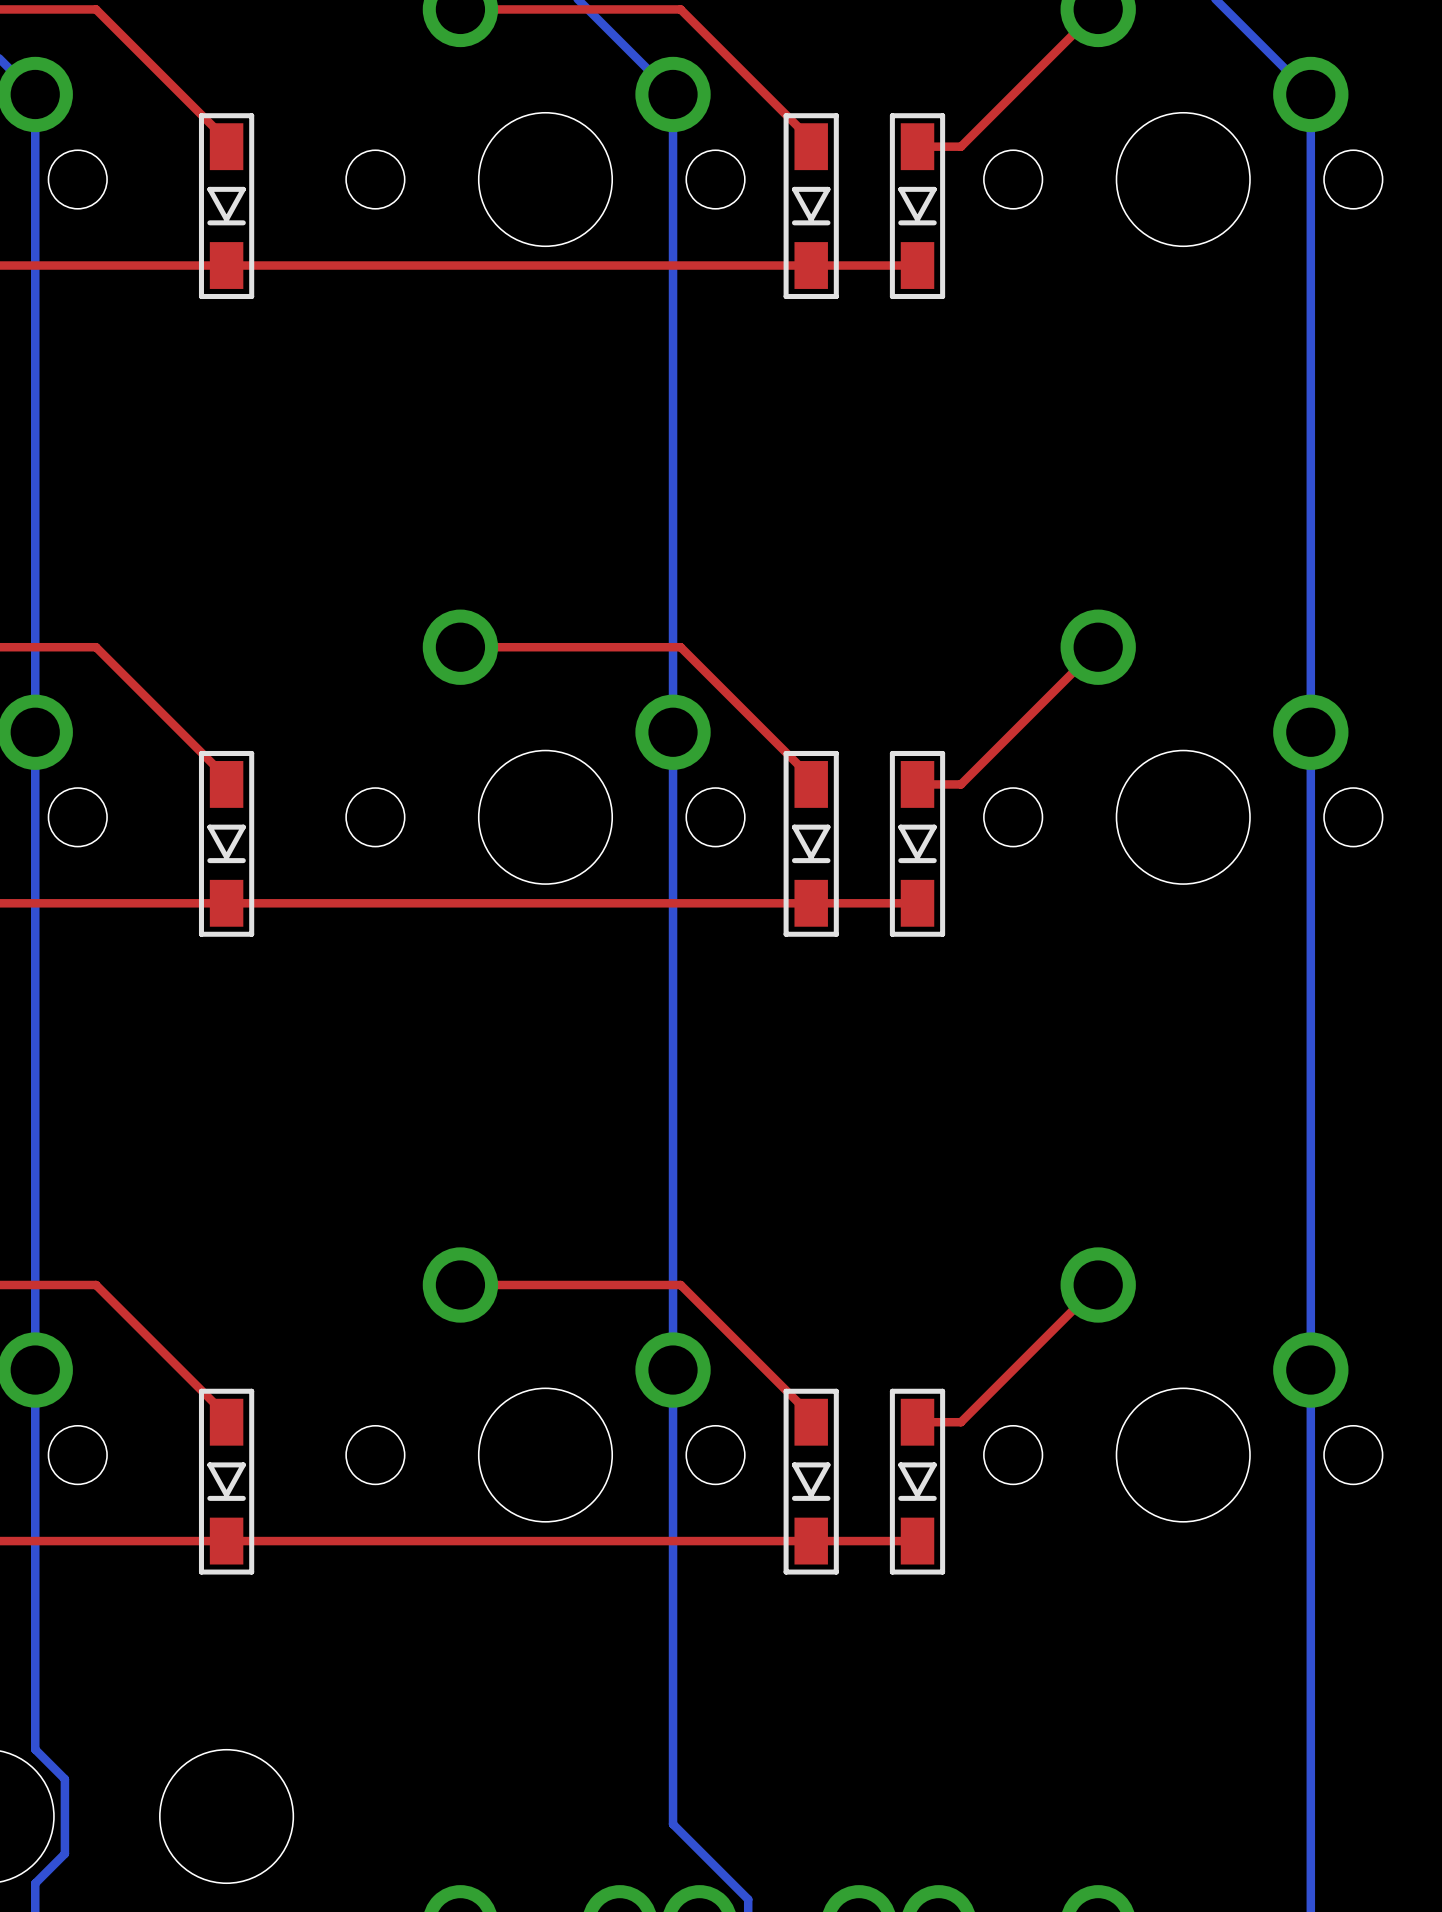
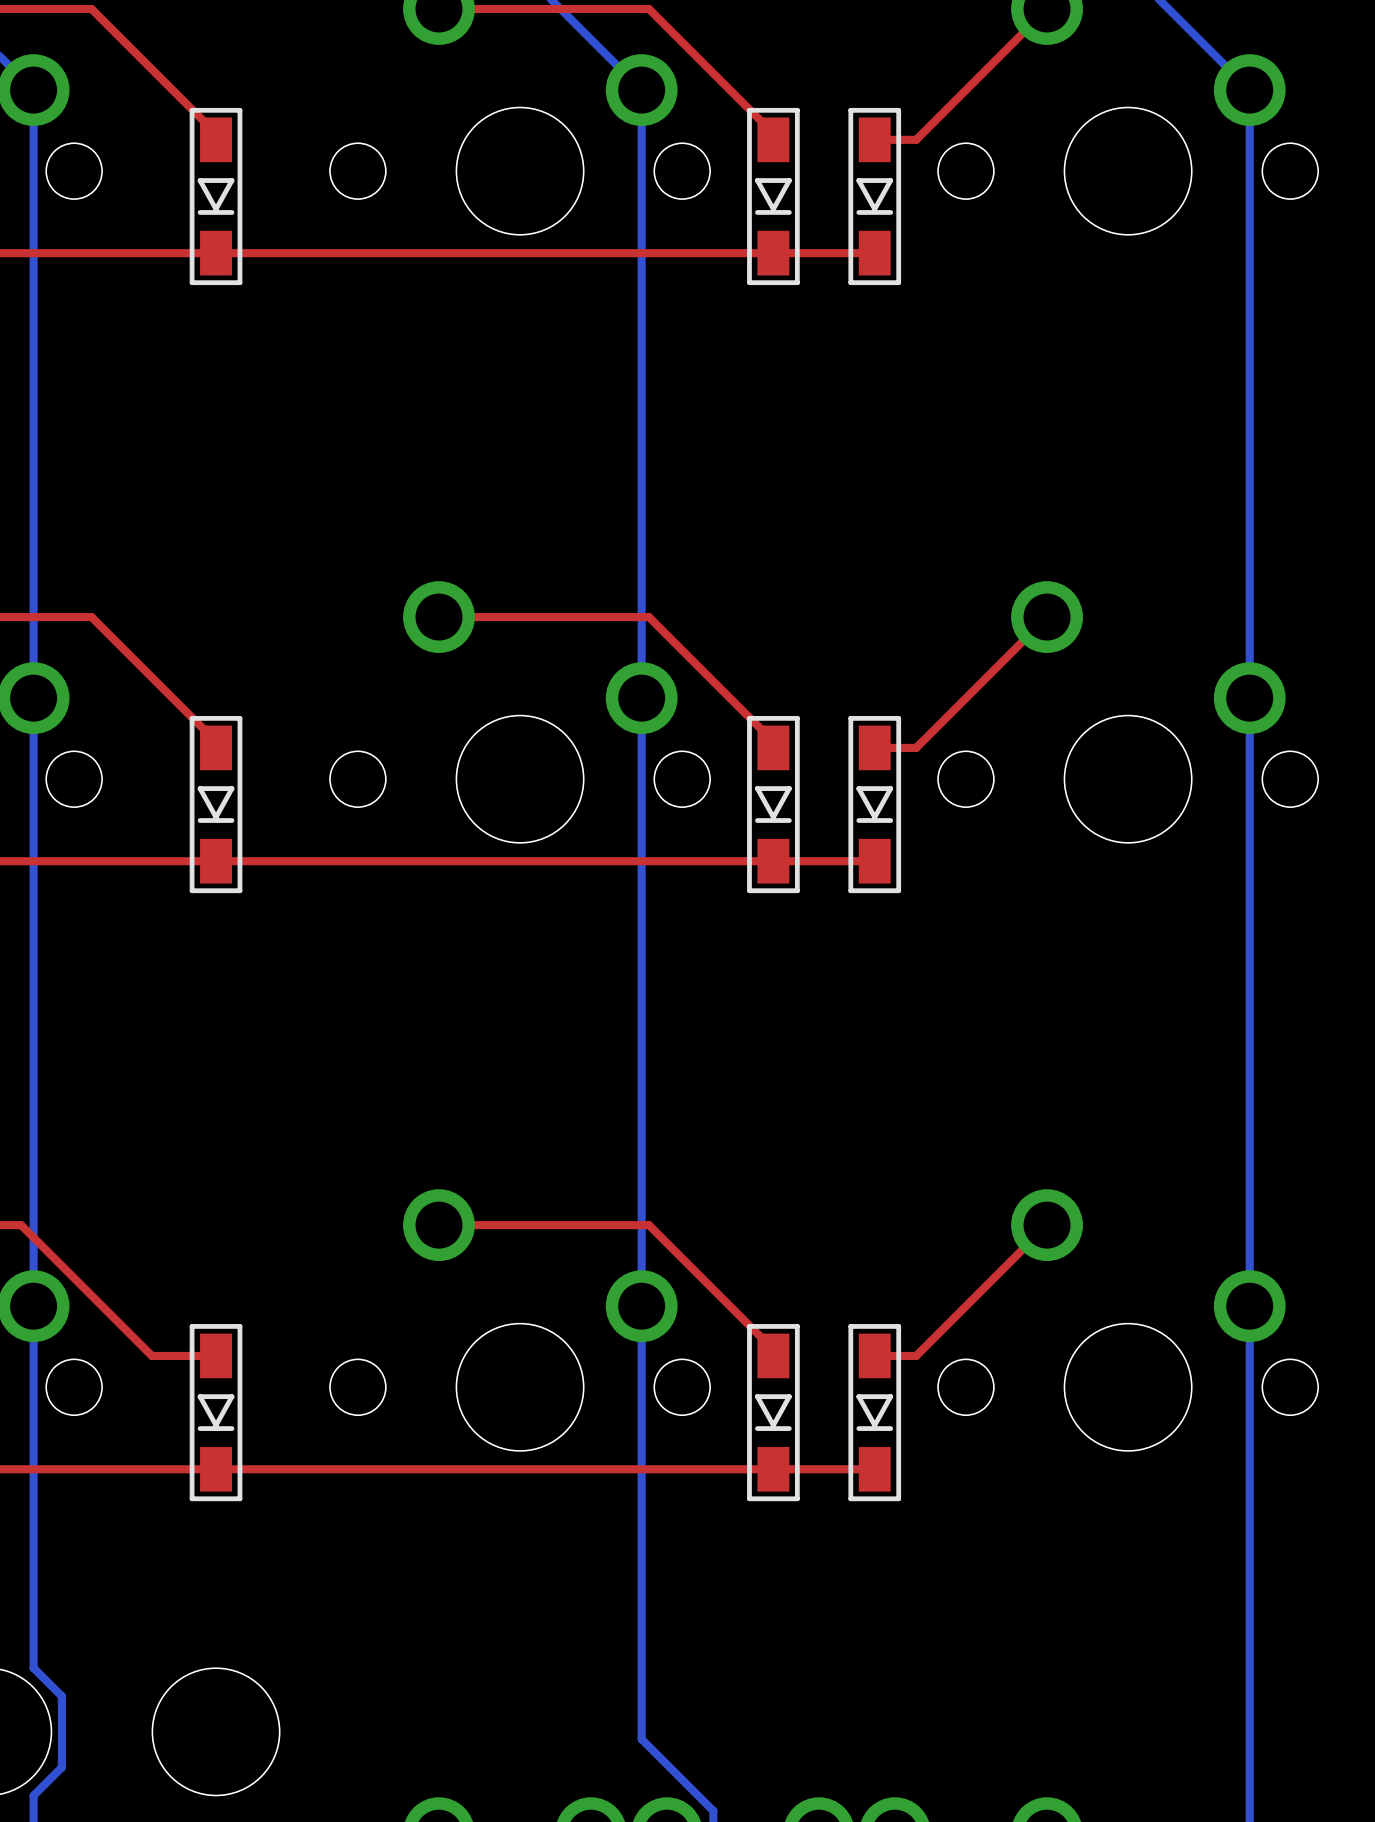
top track: (22, 1285) (96, 1285) (226, 1415) (226, 1422) -> (21, 1225) (151, 1355) (216, 1355)

